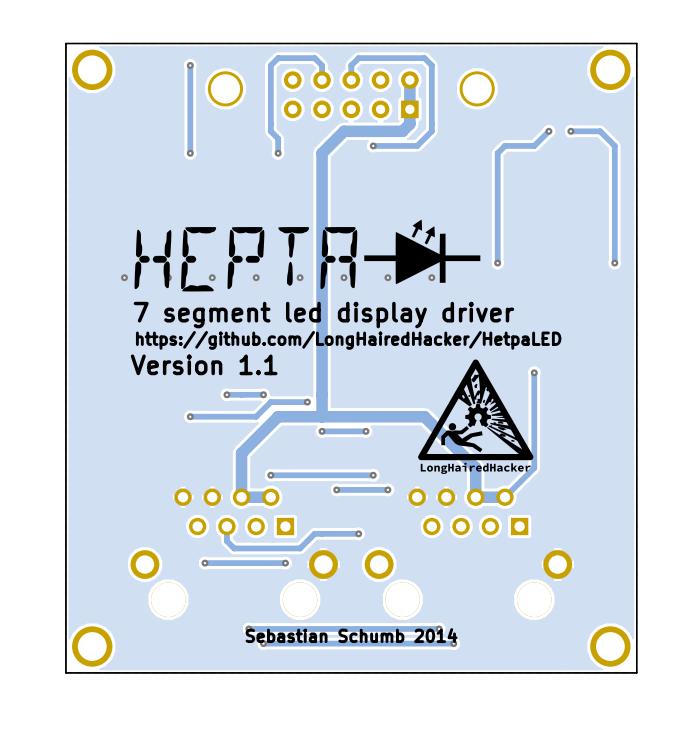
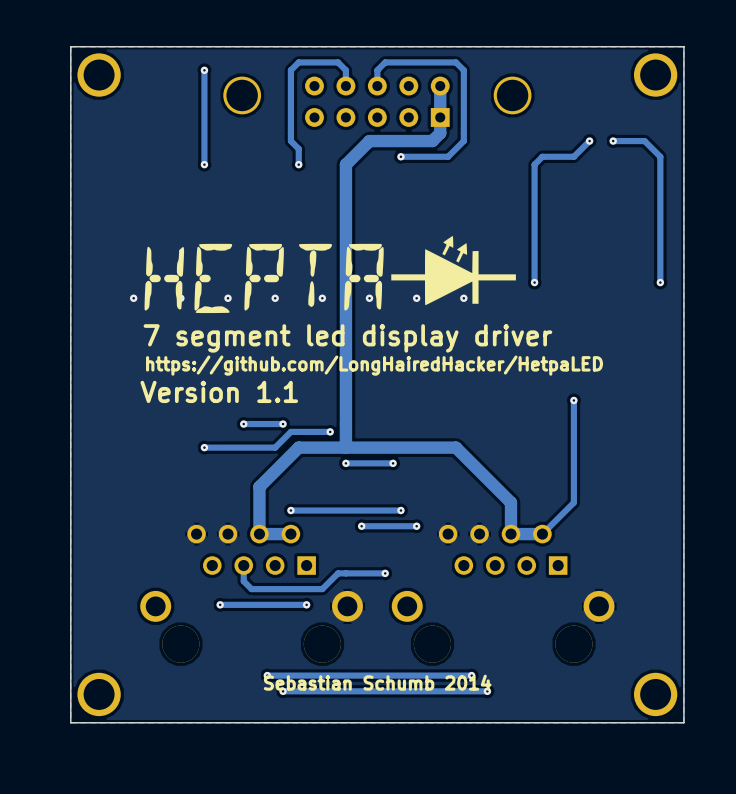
line: (636, 43) (65, 43) (65, 672) (636, 672) (636, 43) -> none
drawing: [418, 359, 534, 474] -> none

